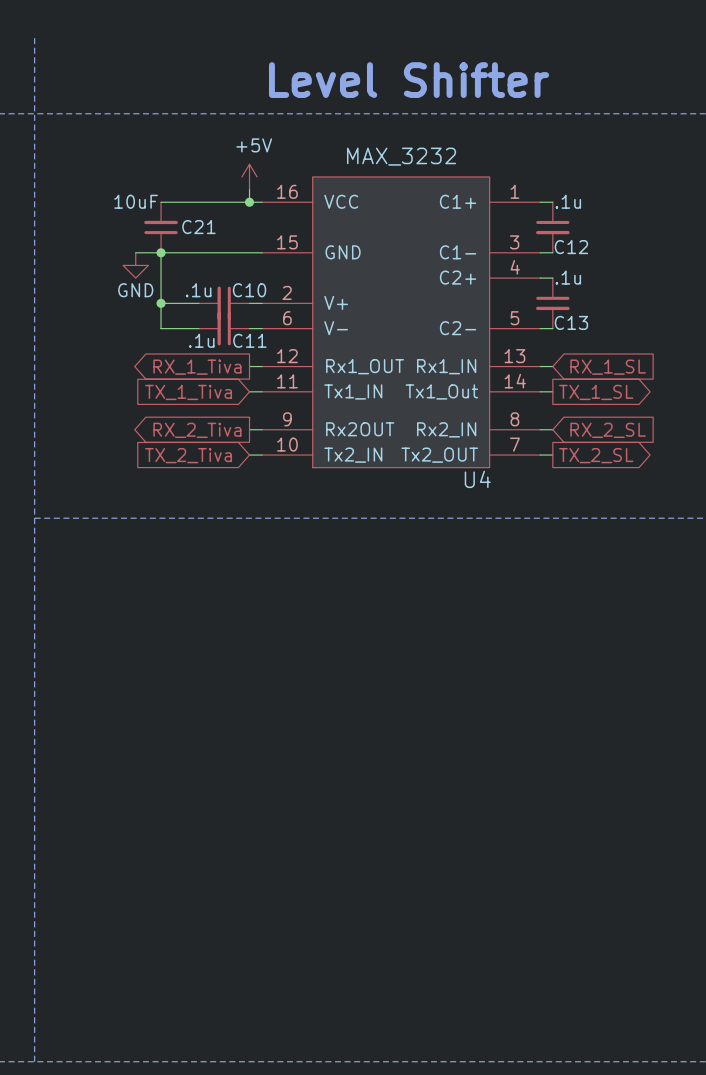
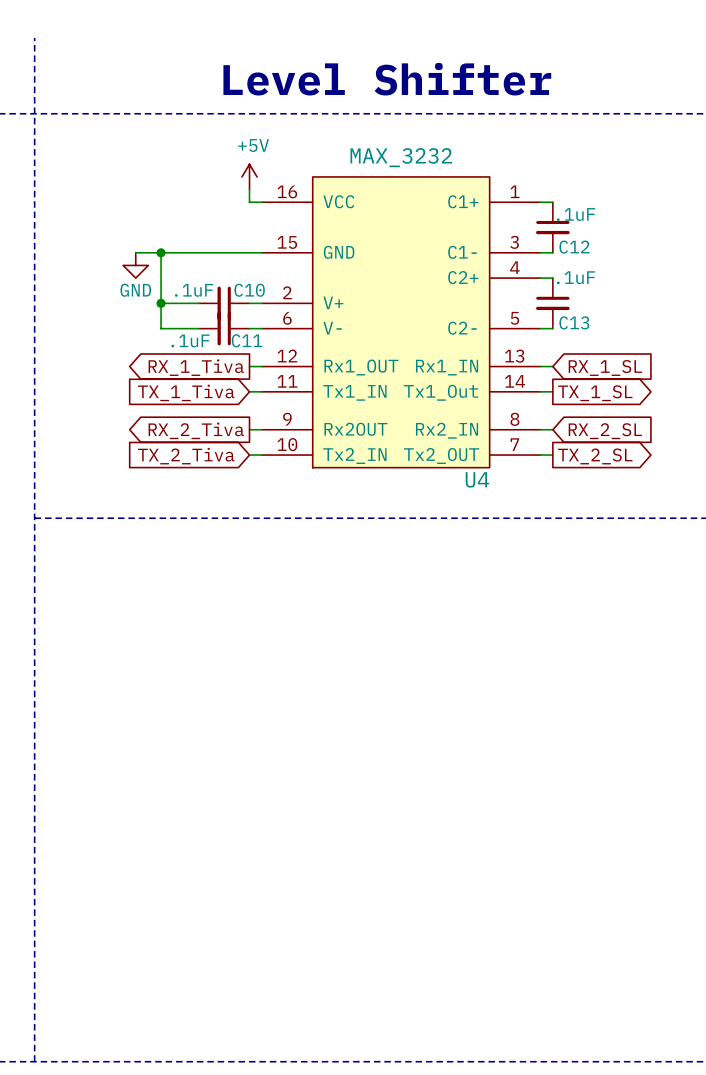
C12 value: .1u (568, 201) -> .1uF (575, 214)
wire: (161, 202) (249, 202) -> none
junction: (249, 202) -> none
C21: 10uF (161, 227) -> none
C13 value: .1u (568, 277) -> .1uF (575, 277)
C10 value: .1u (198, 290) -> .1uF (194, 290)
C11 value: .1u (201, 340) -> .1uF (190, 340)

